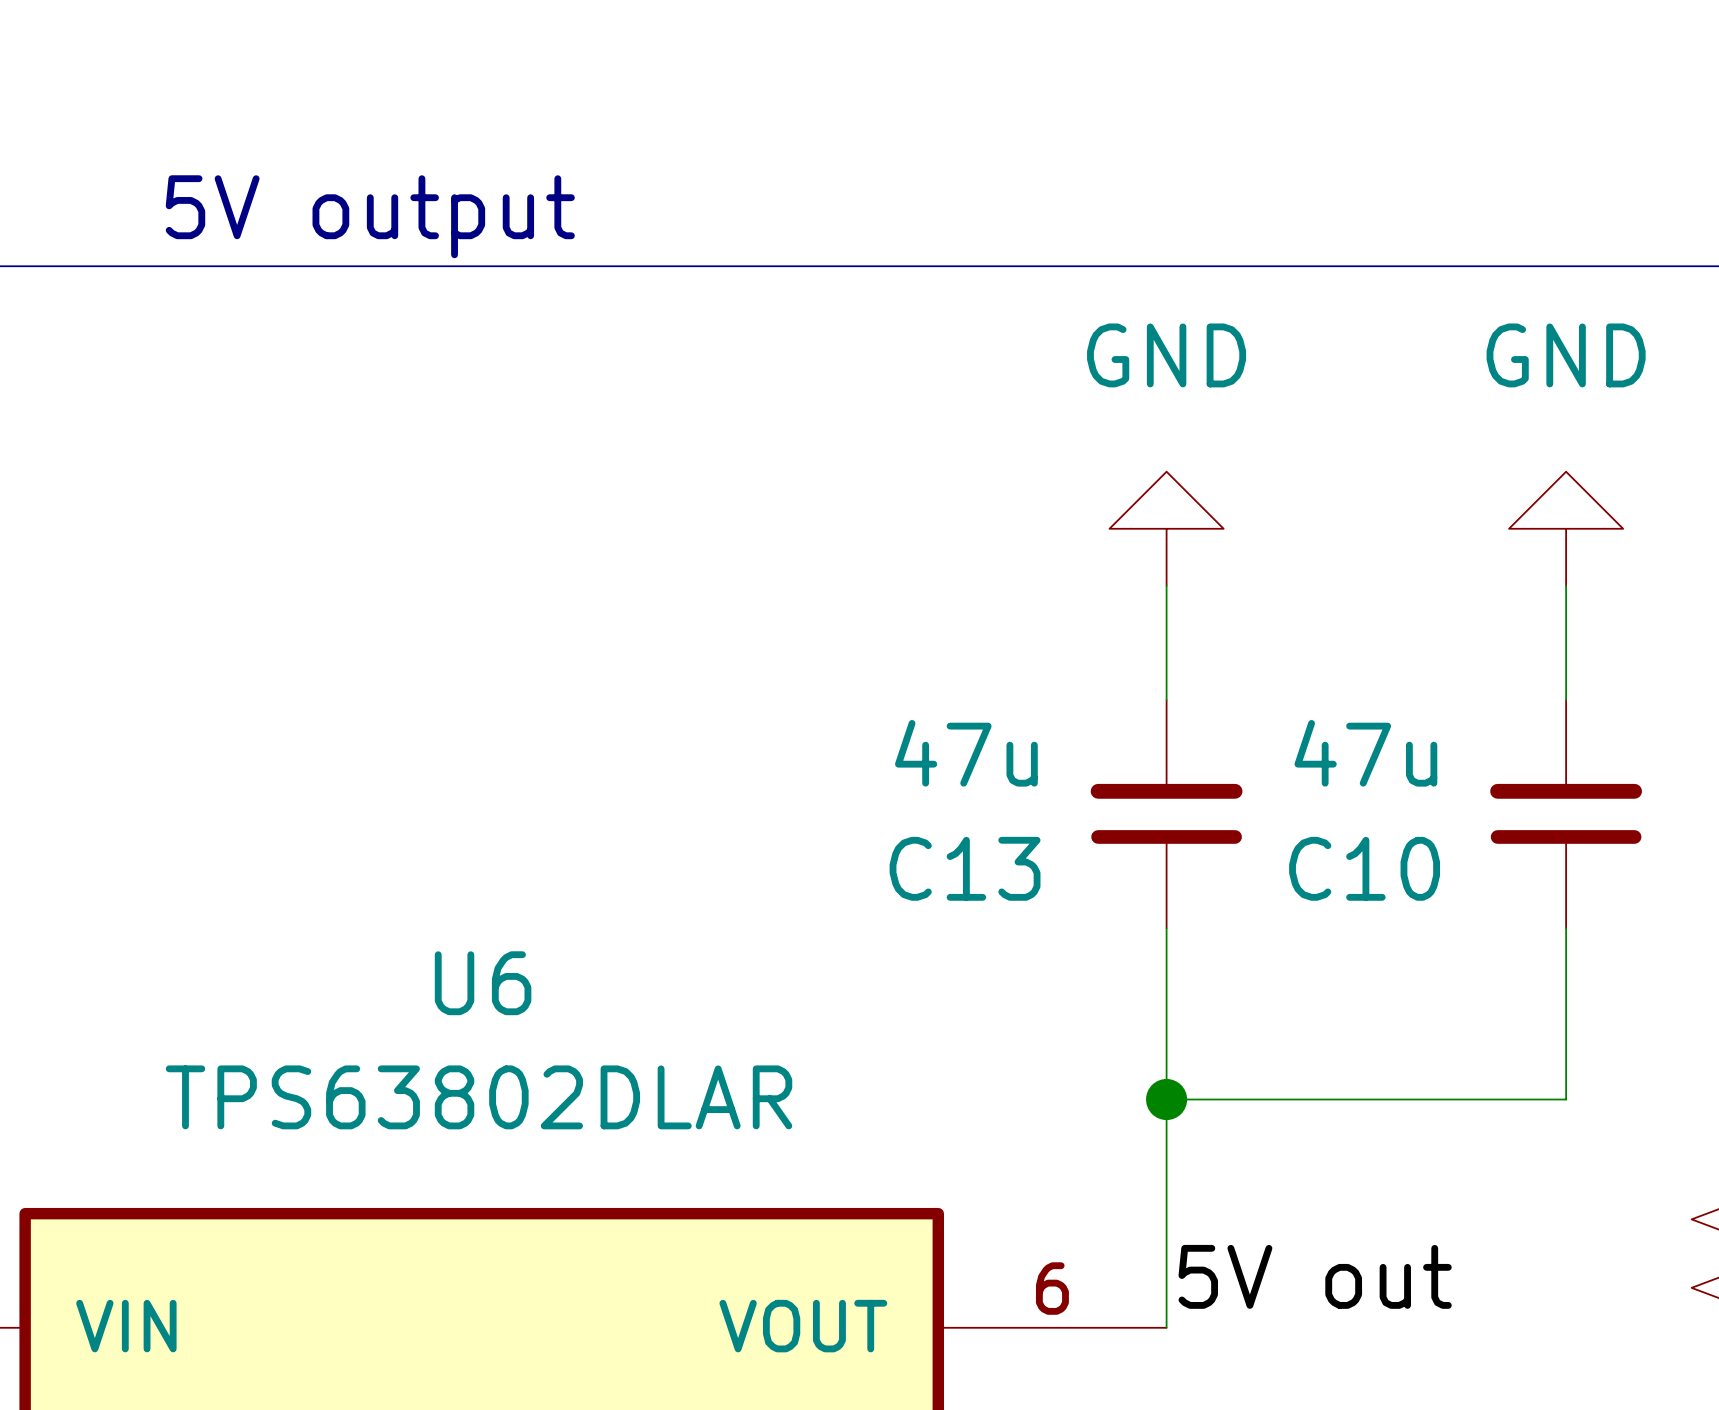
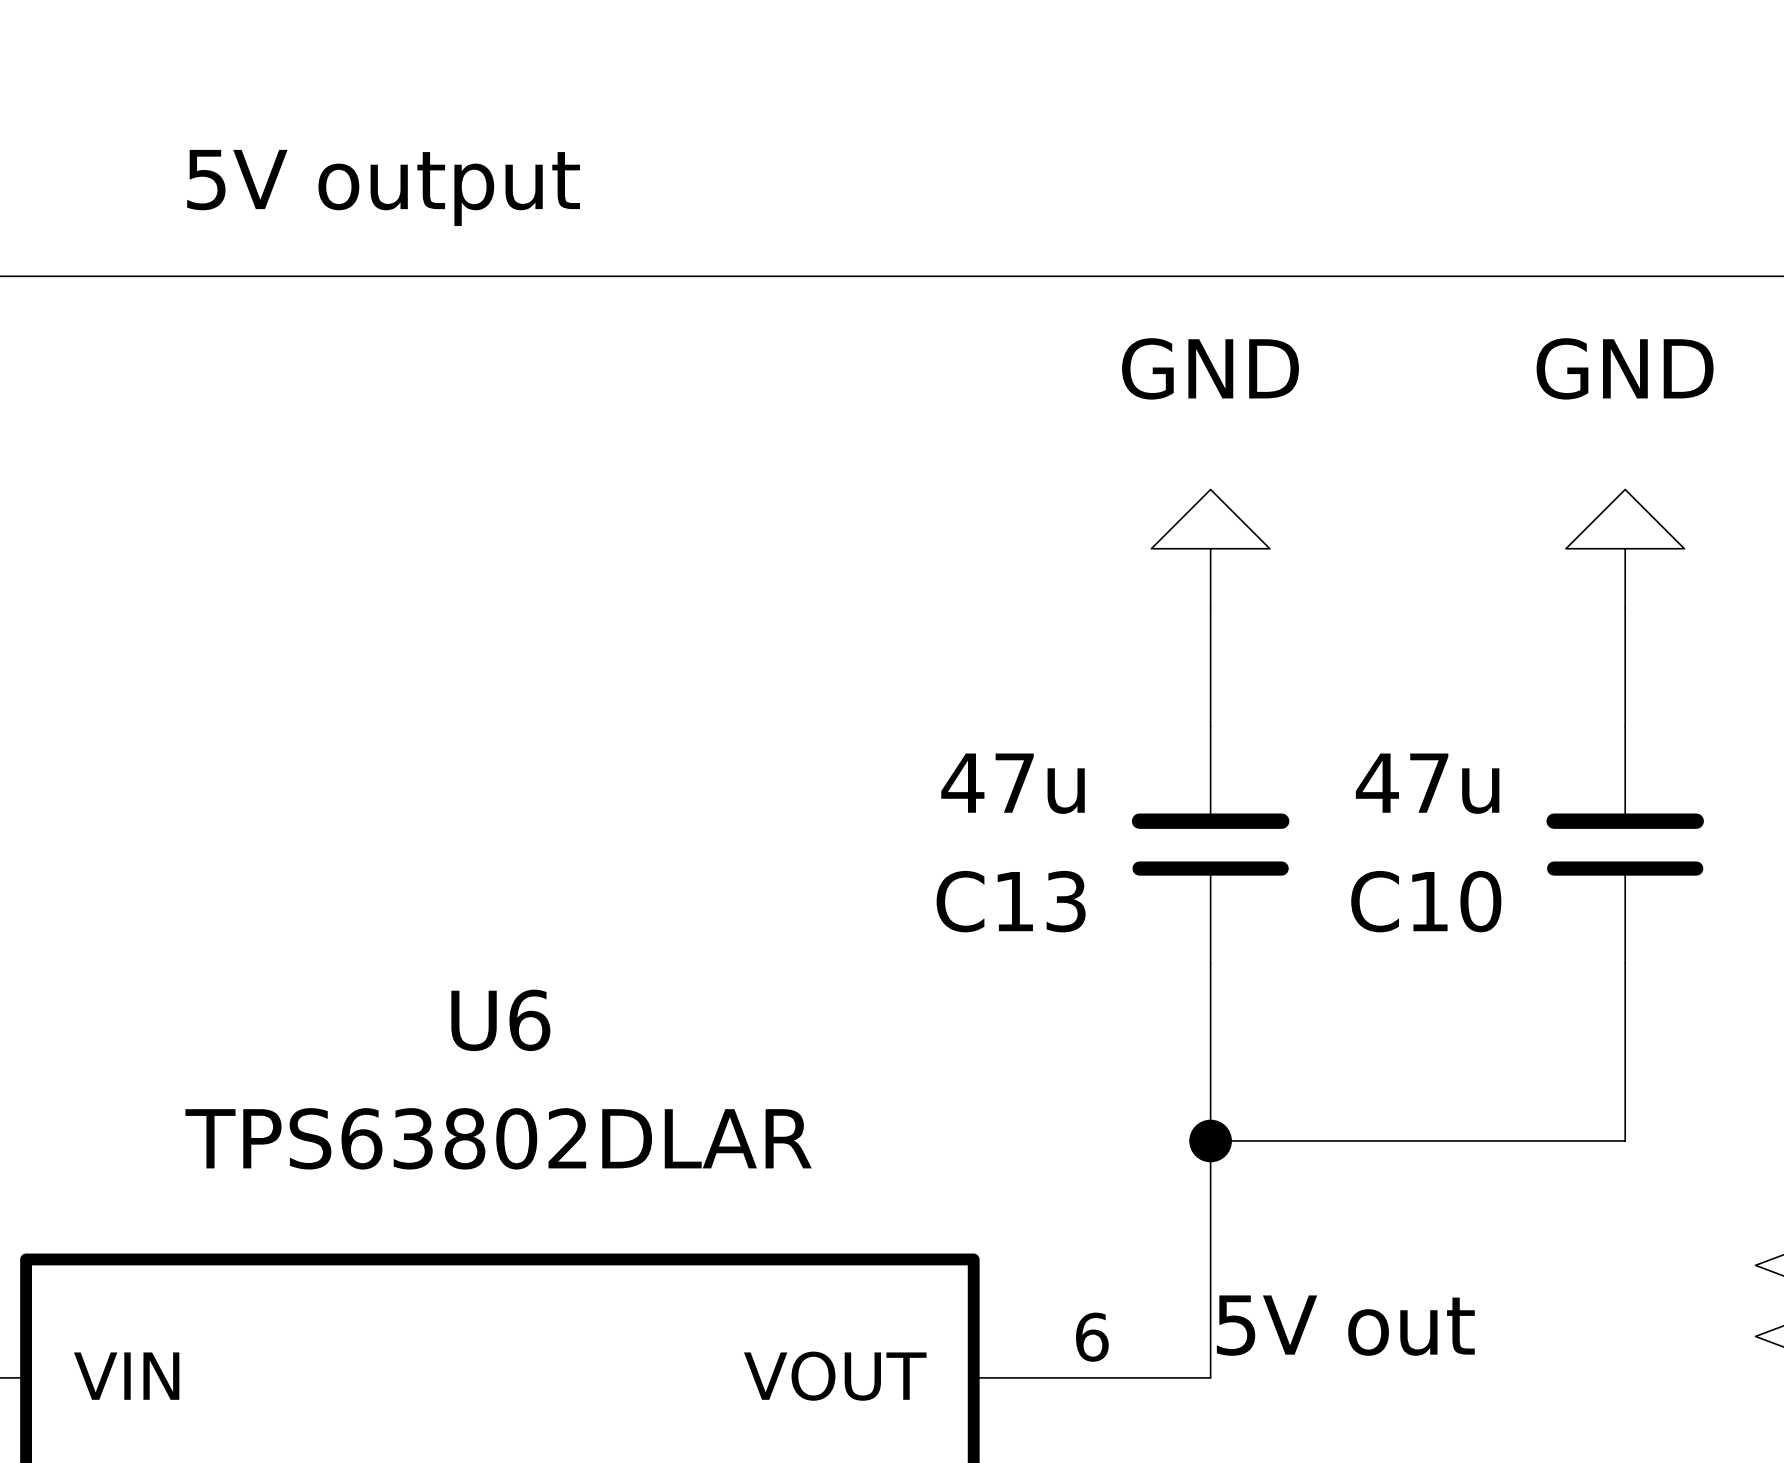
text position: 5V output (370, 216) -> 5V output (383, 187)

